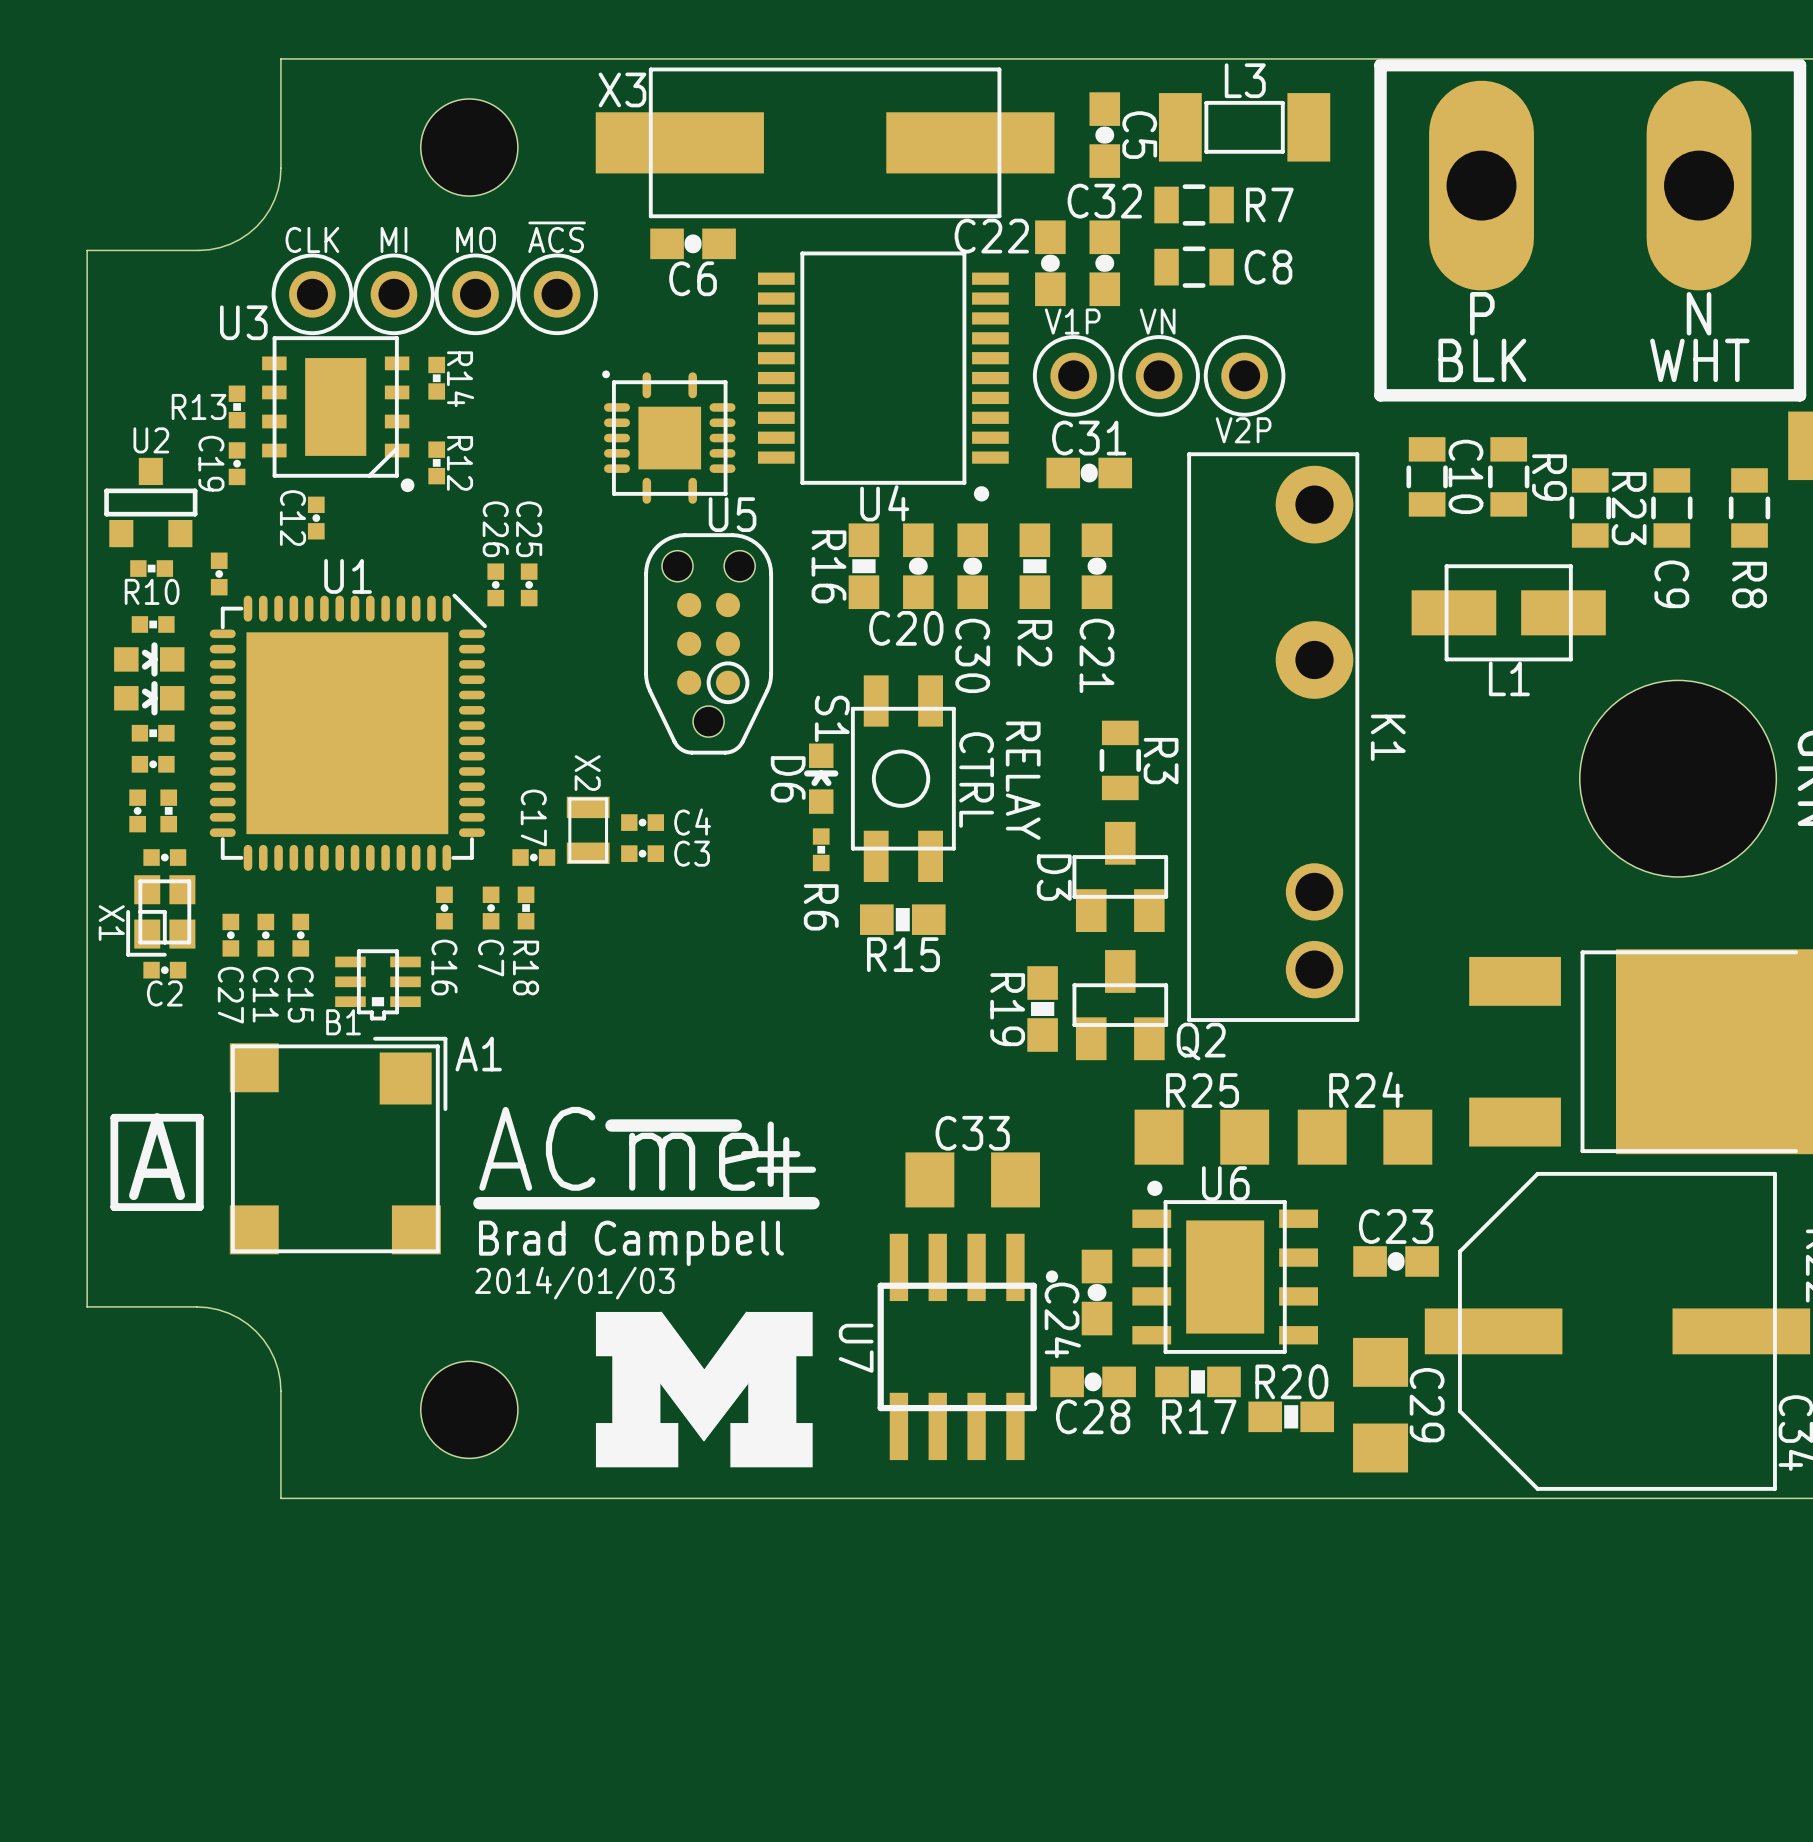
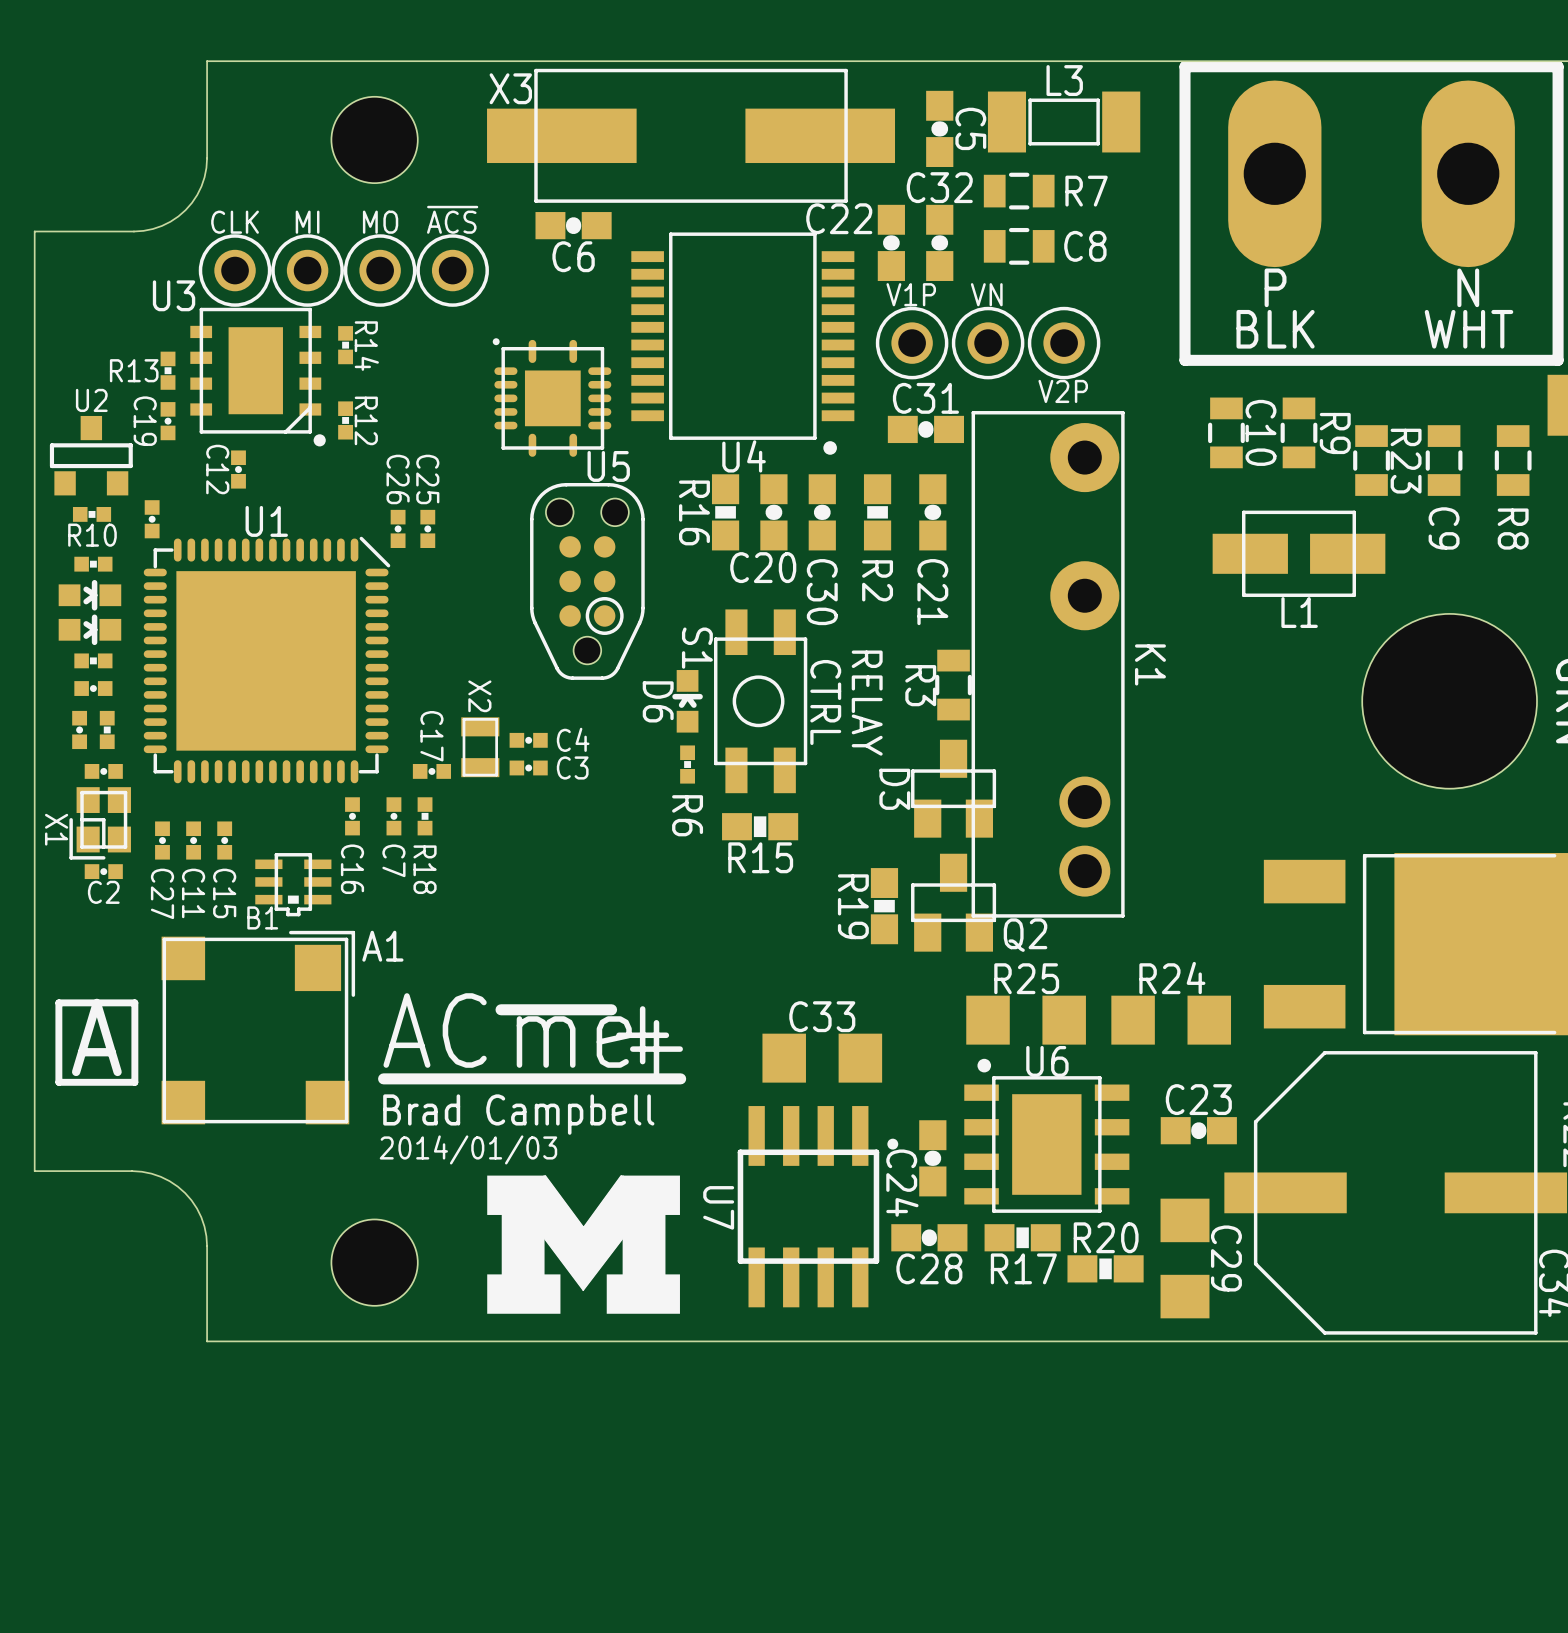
K1 position: (1273, 737) -> (1048, 664)
R3 name position: R3 (1161, 761) -> R3 (920, 685)

